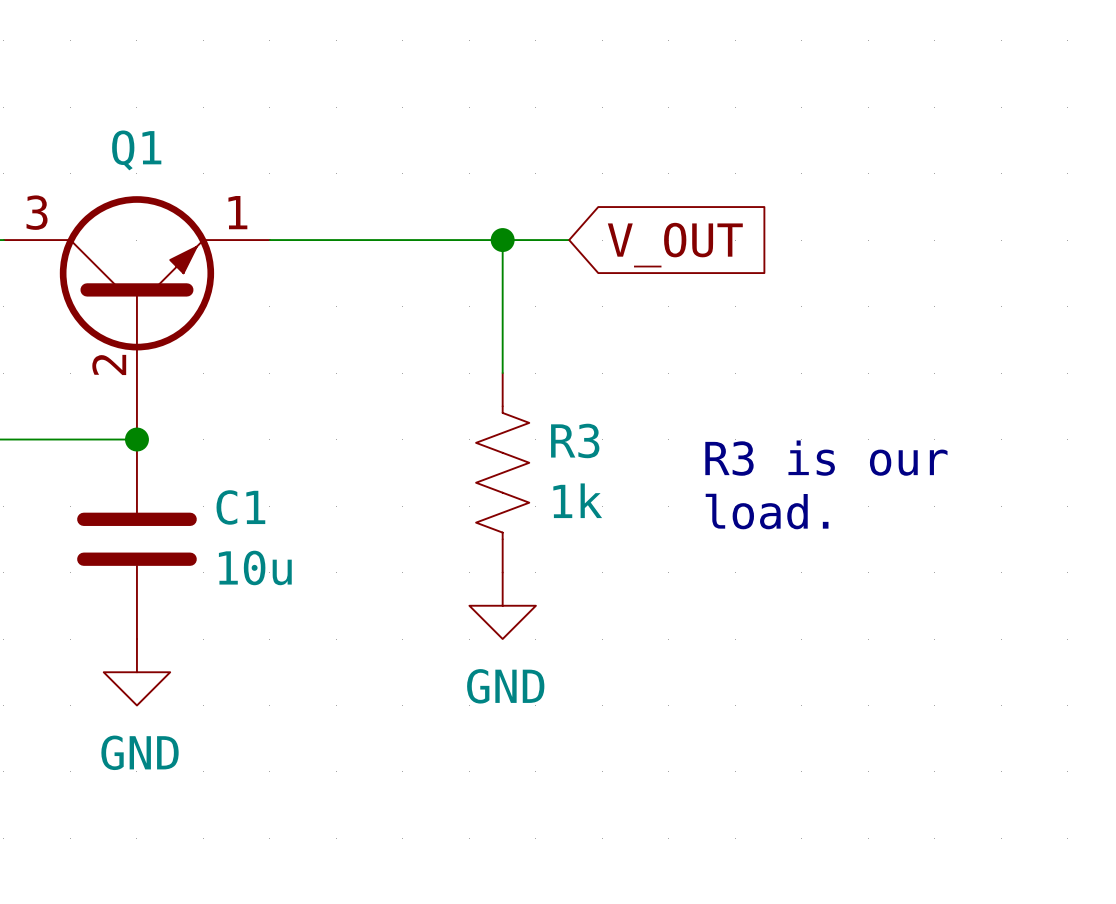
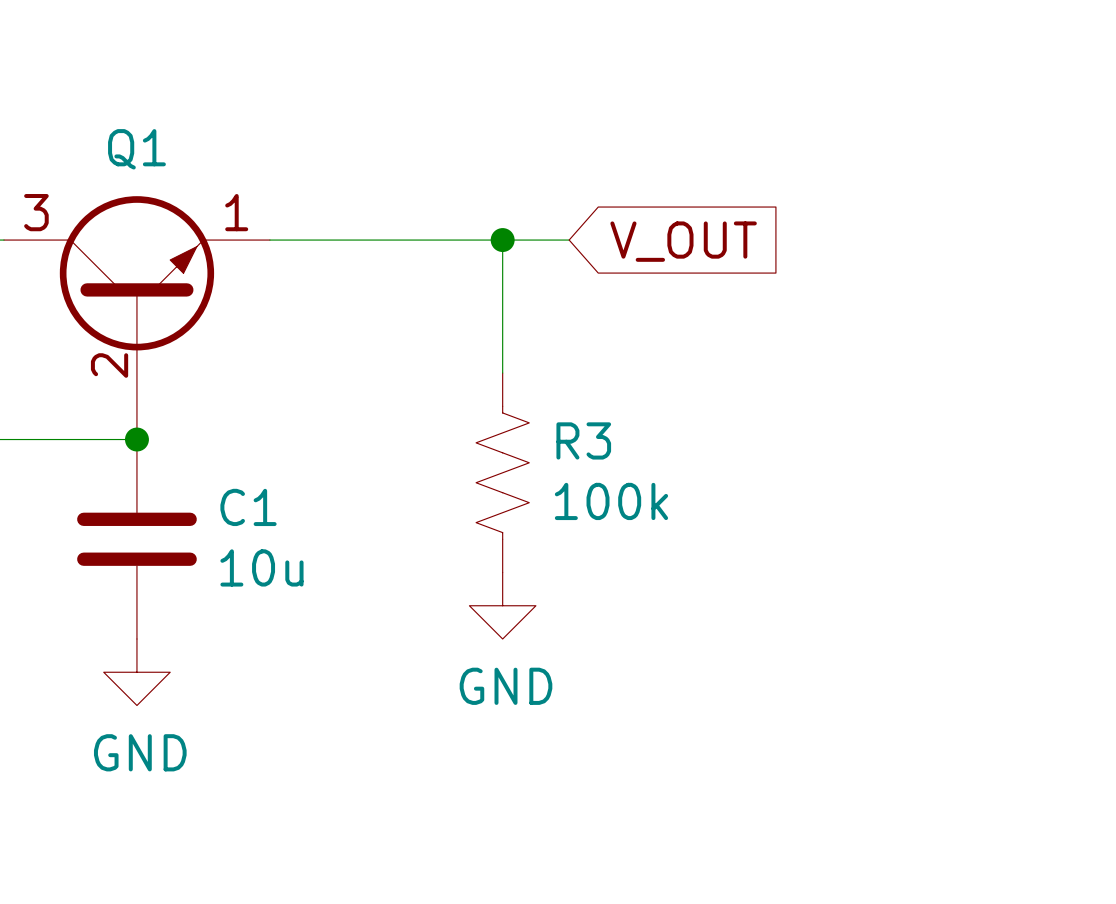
text: R3 is our (826, 458) -> none
R3 value: 1k (577, 500) -> 100k (611, 501)
text: load. (767, 511) -> none

